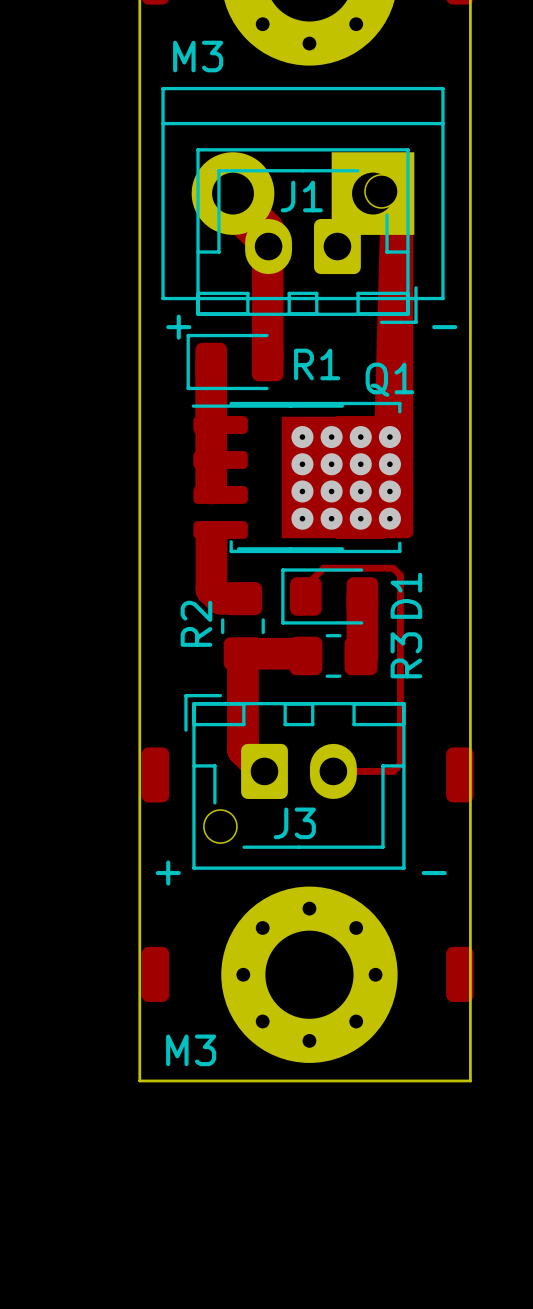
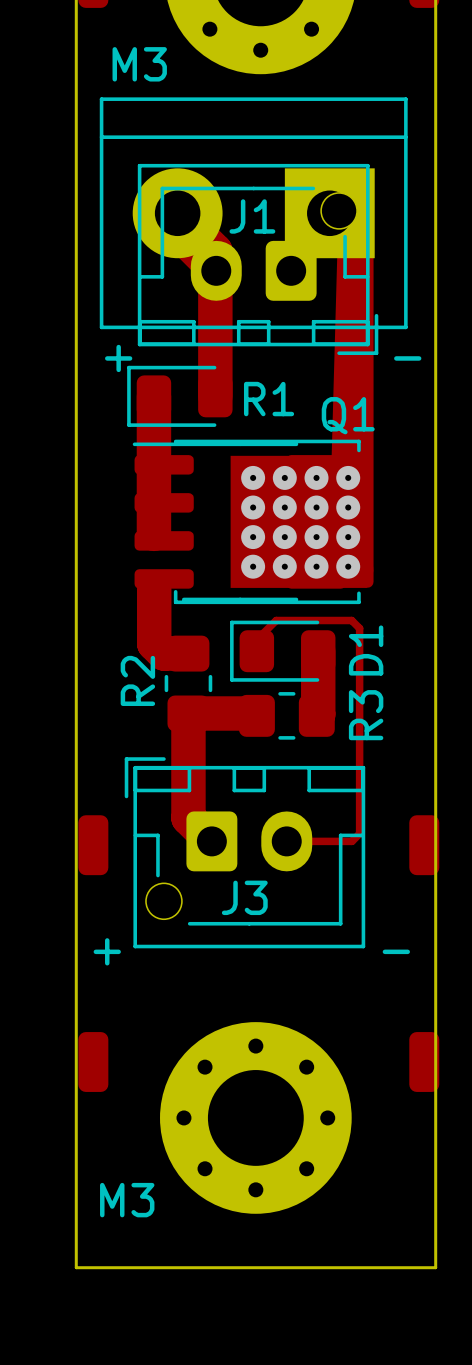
M3 position: (309, 974) -> (255, 1117)
board edge: (139, 1080) (470, 1080) -> (76, 1177) (76, 1267) (435, 1267) (435, 1177)

